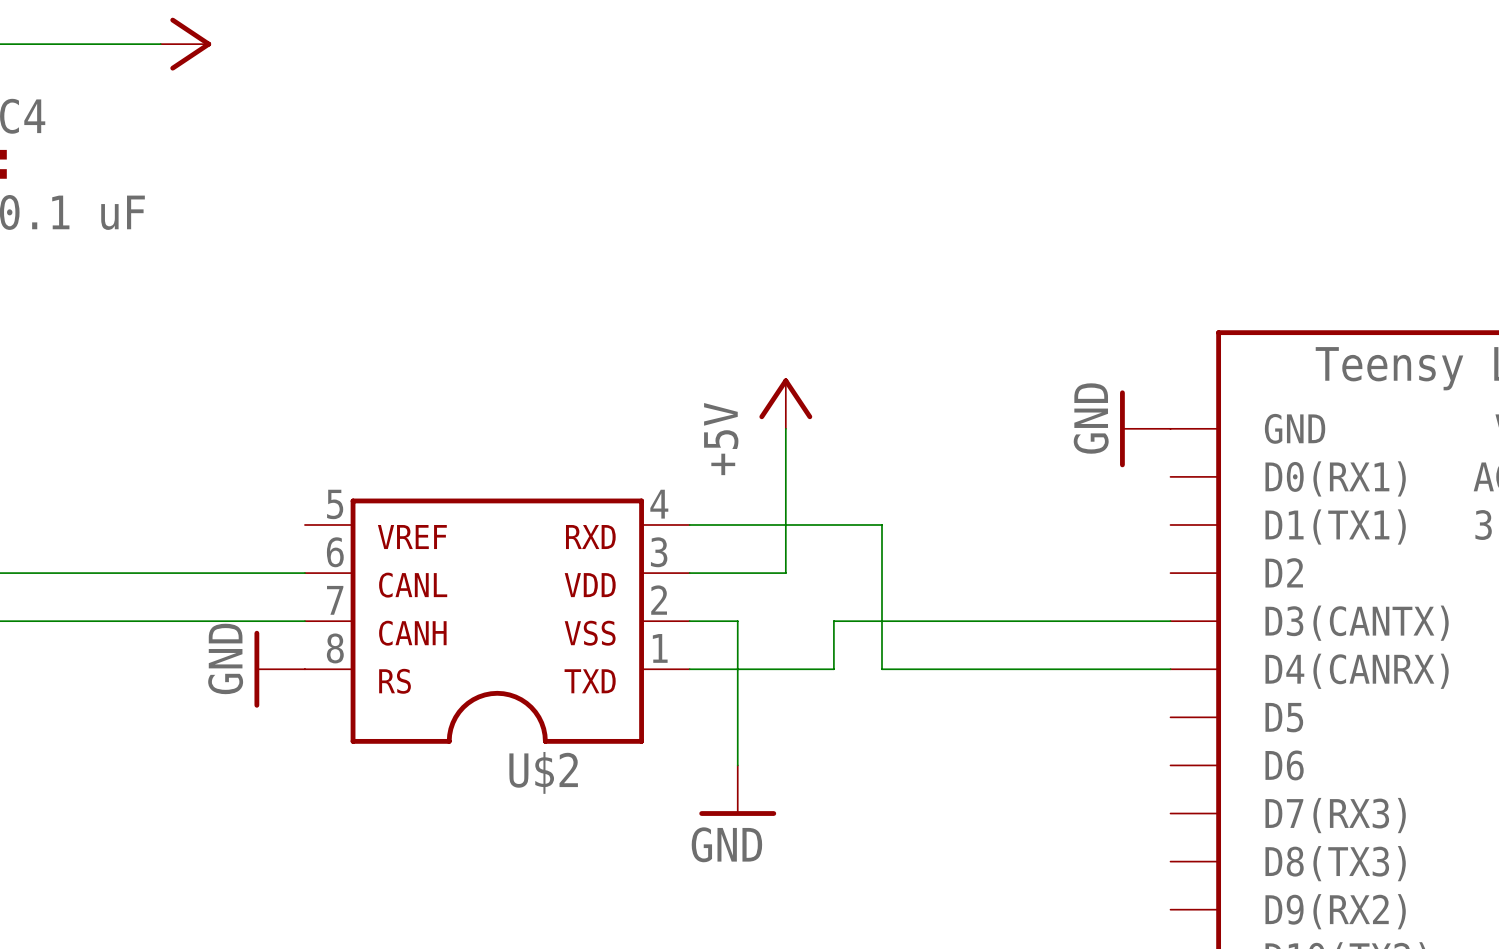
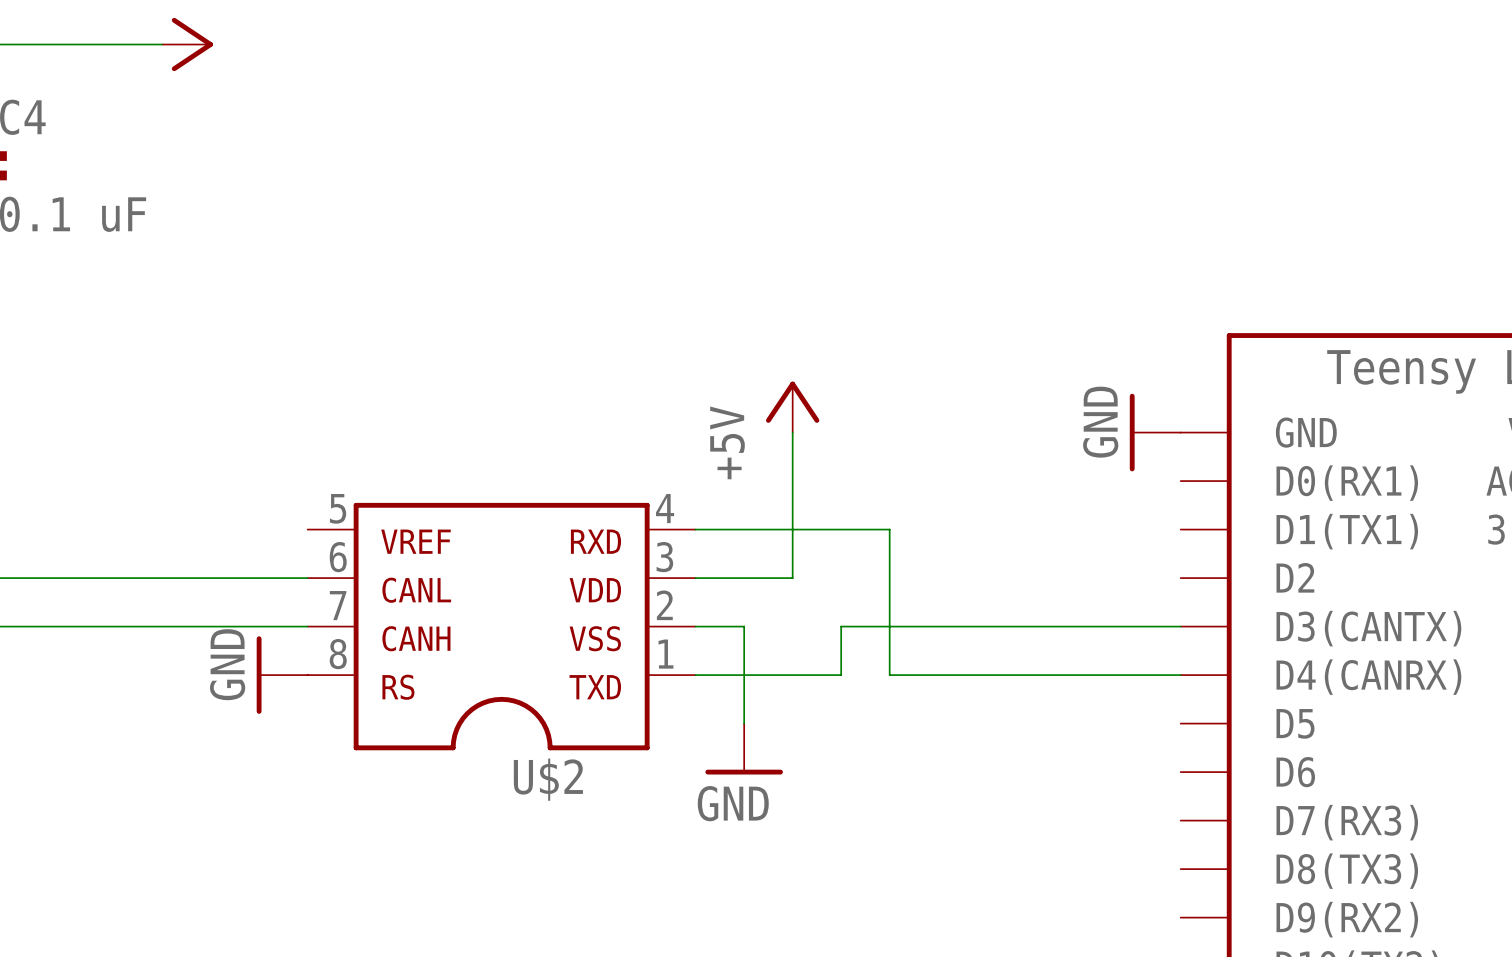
power symbol position: GND (737, 790) -> GND (744, 749)

